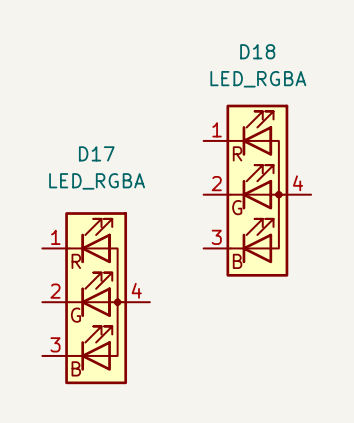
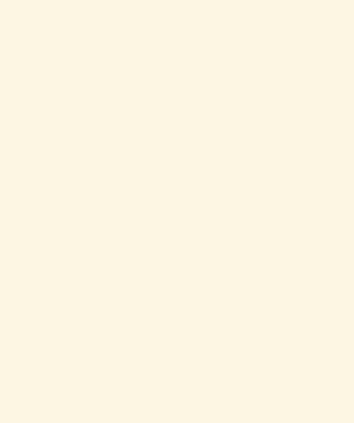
D18: LED_RGBA (257, 190) -> none
D17: LED_RGBA (96, 298) -> none

